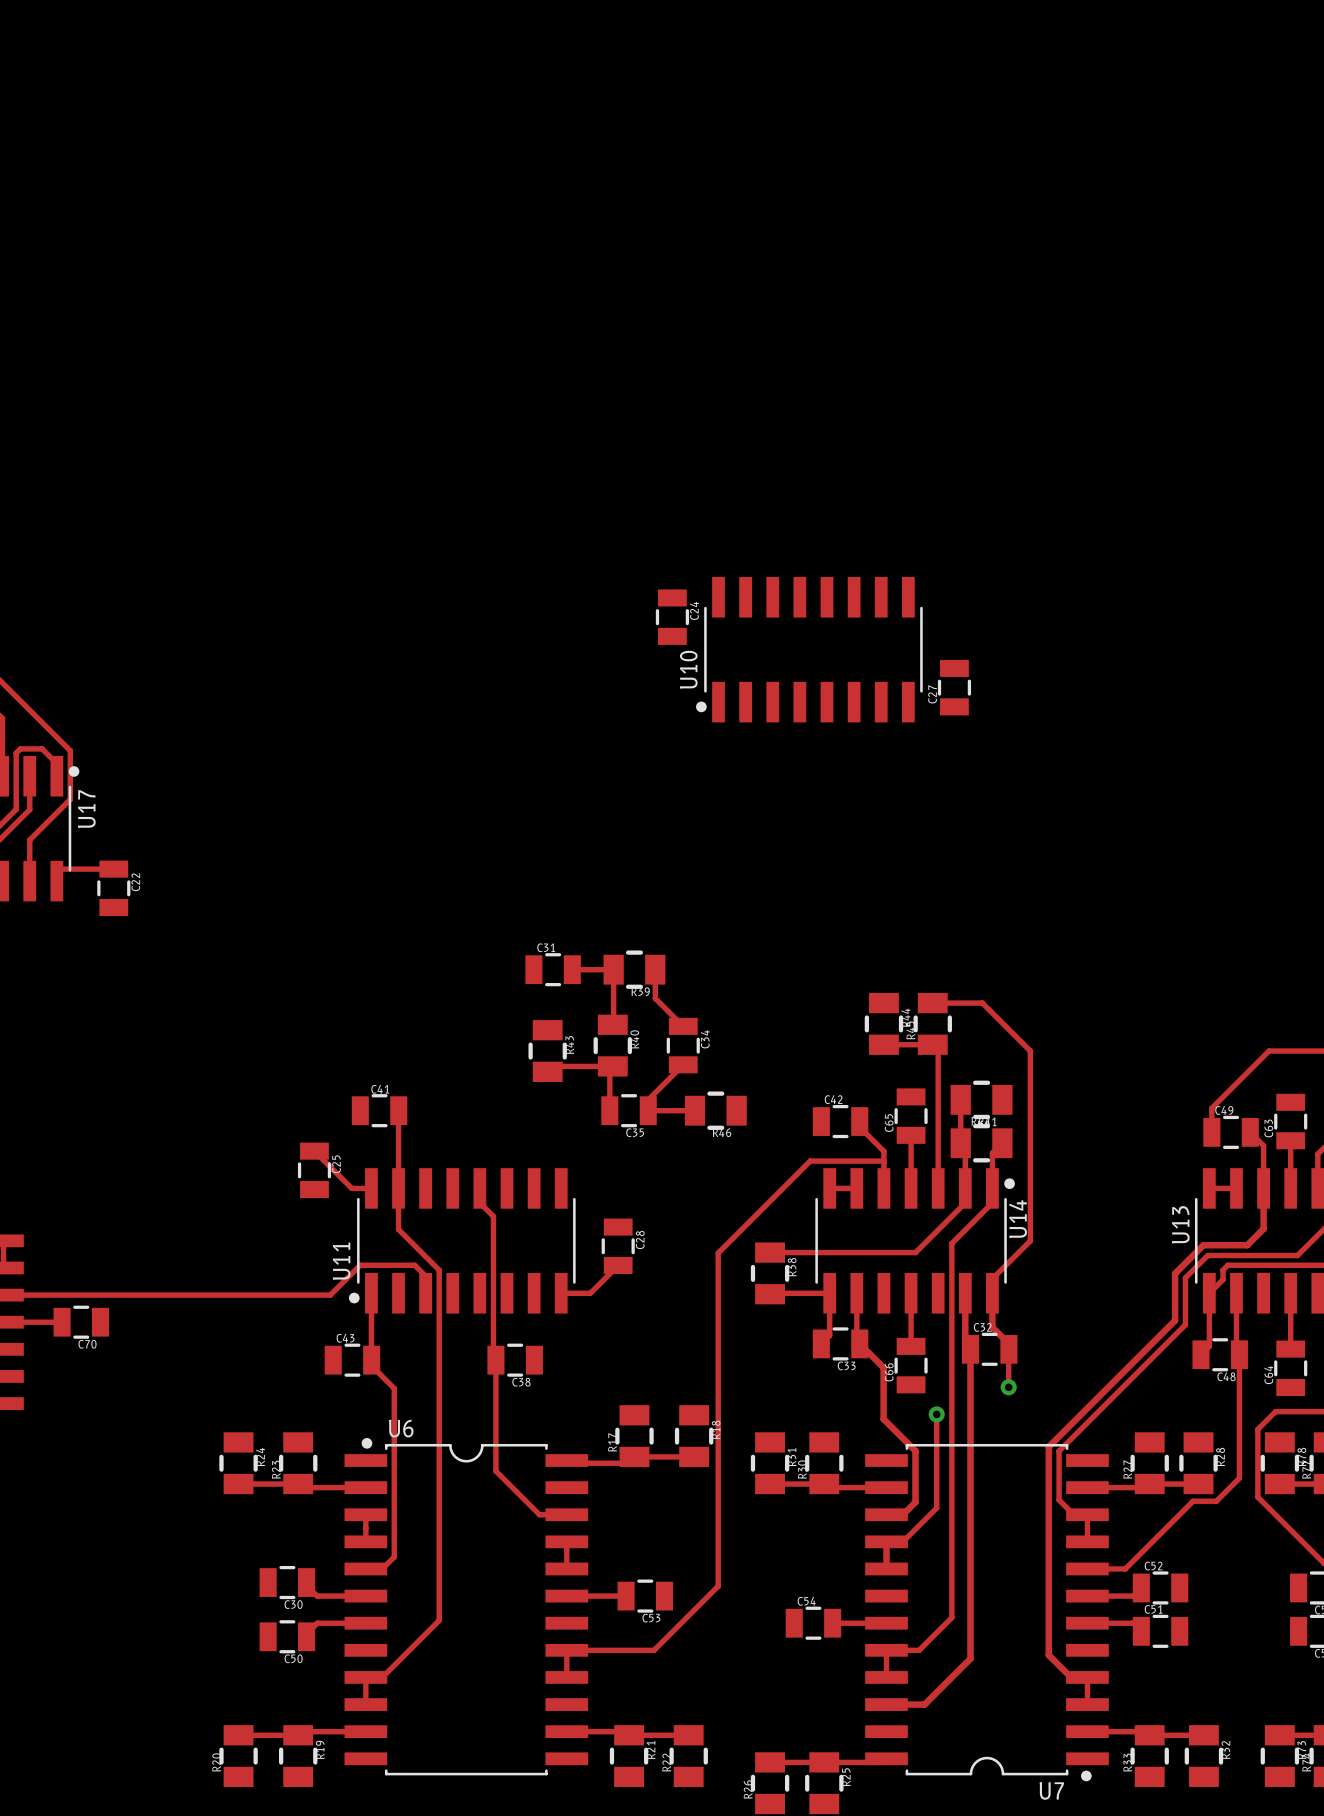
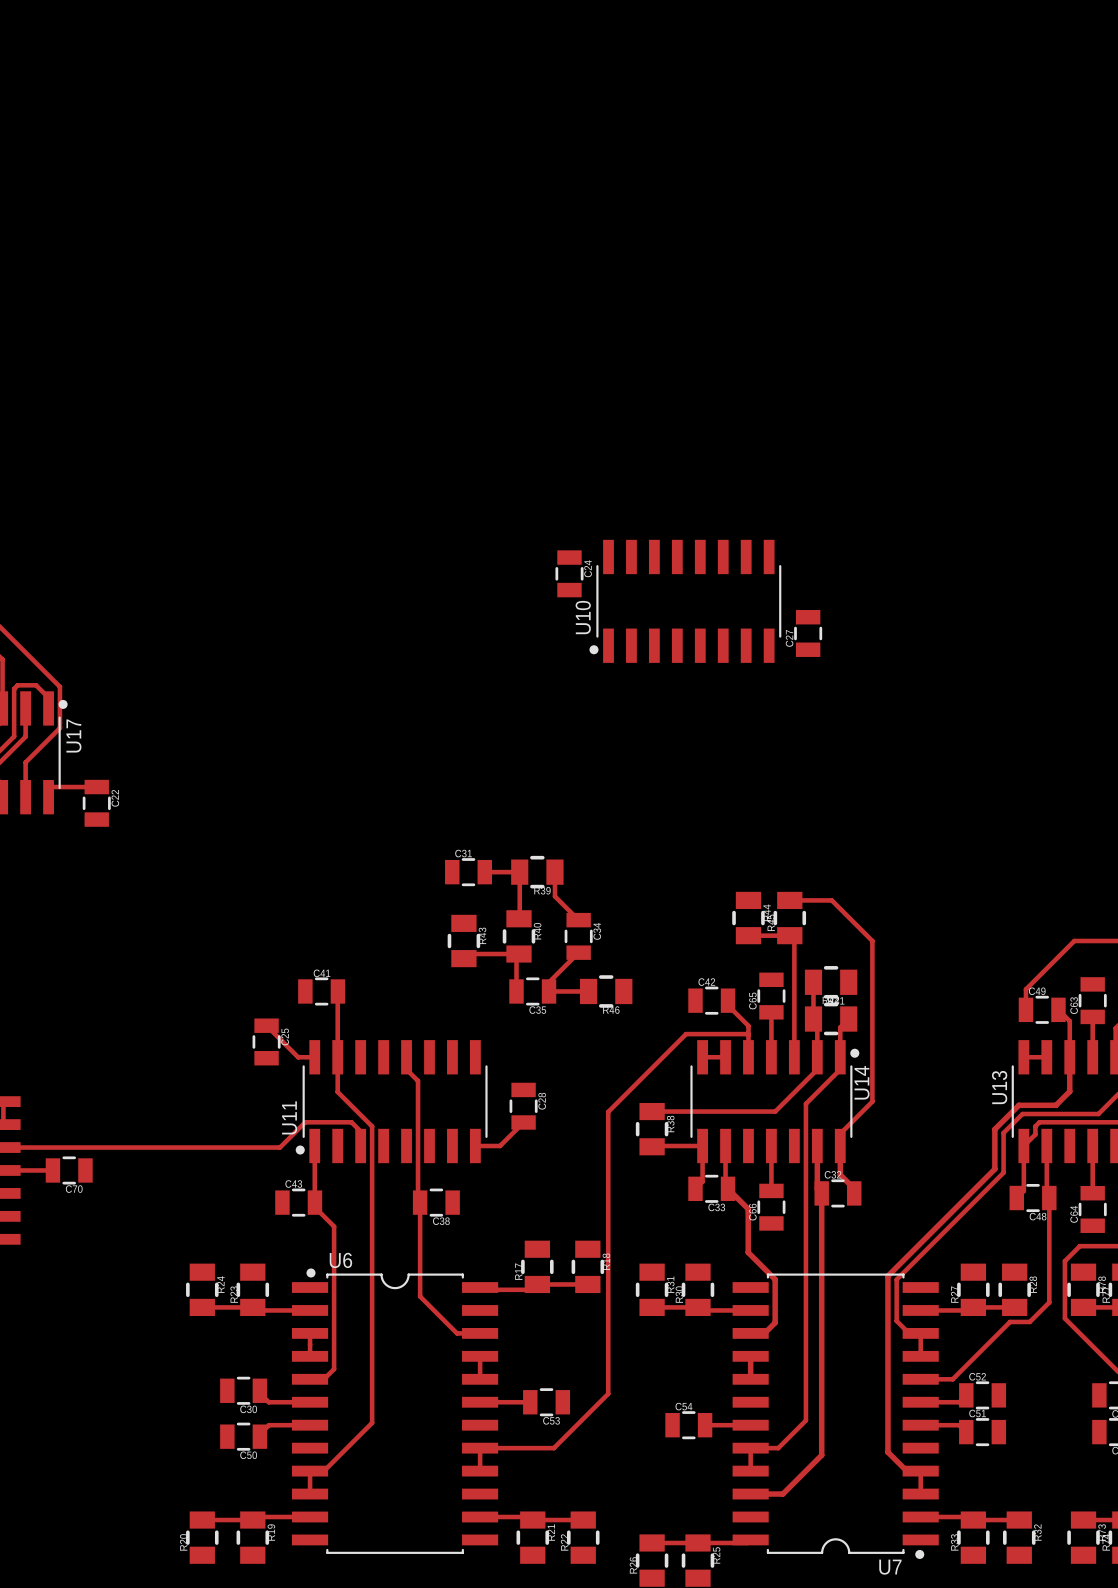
track: (1008, 1349) (1008, 1387) -> none
via: (1008, 1387) -> none
track: (936, 1414) (936, 1508) (902, 1541) (886, 1541) -> none
via: (936, 1414) -> none

